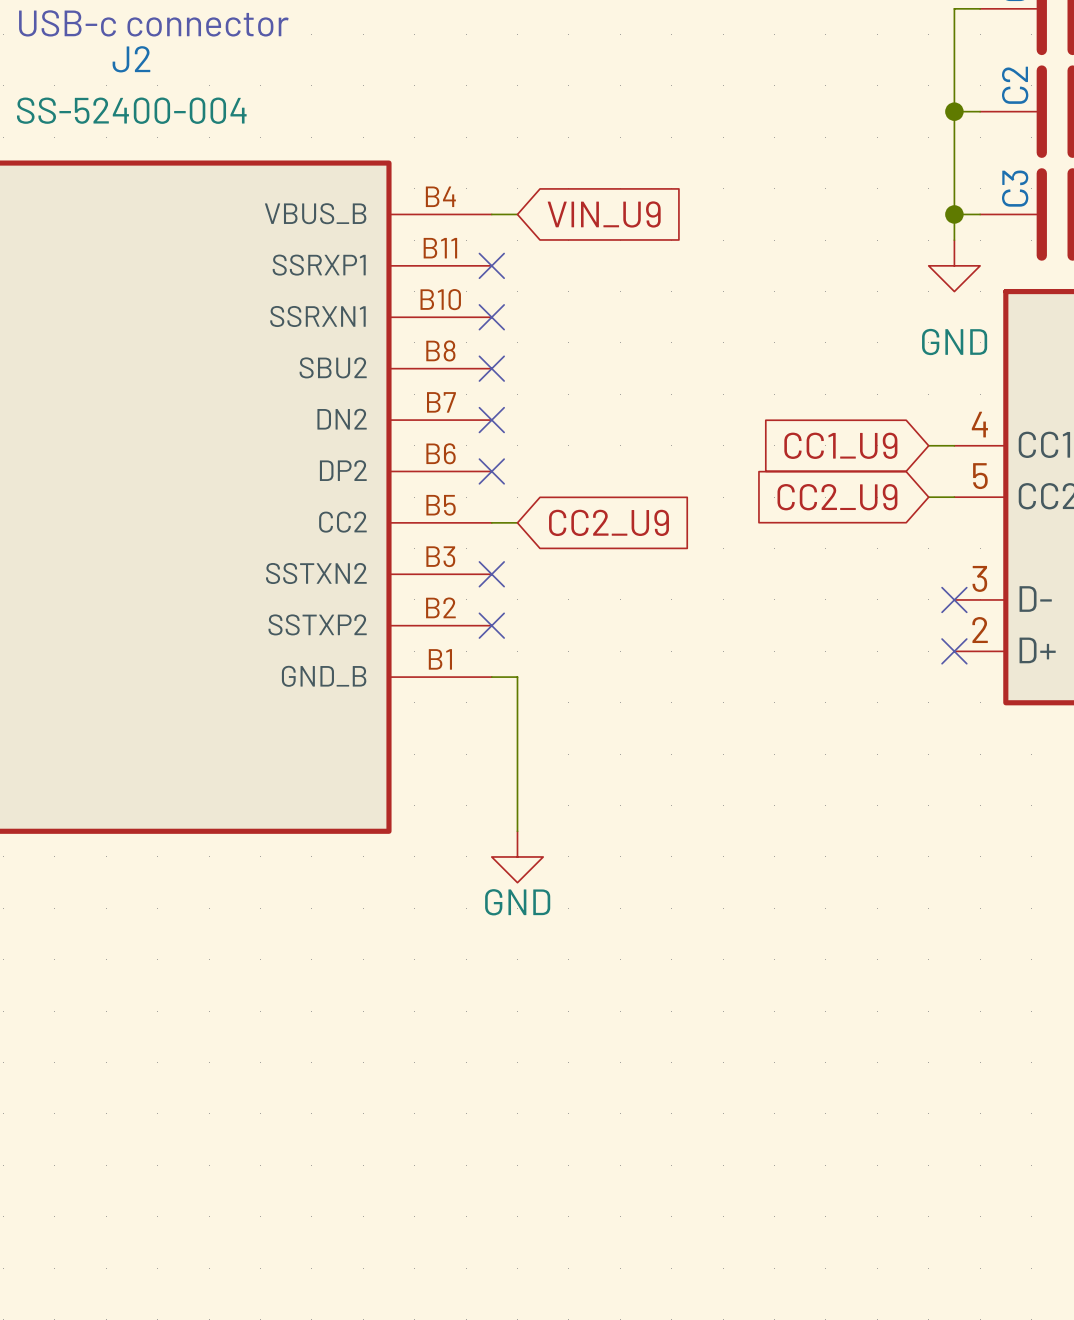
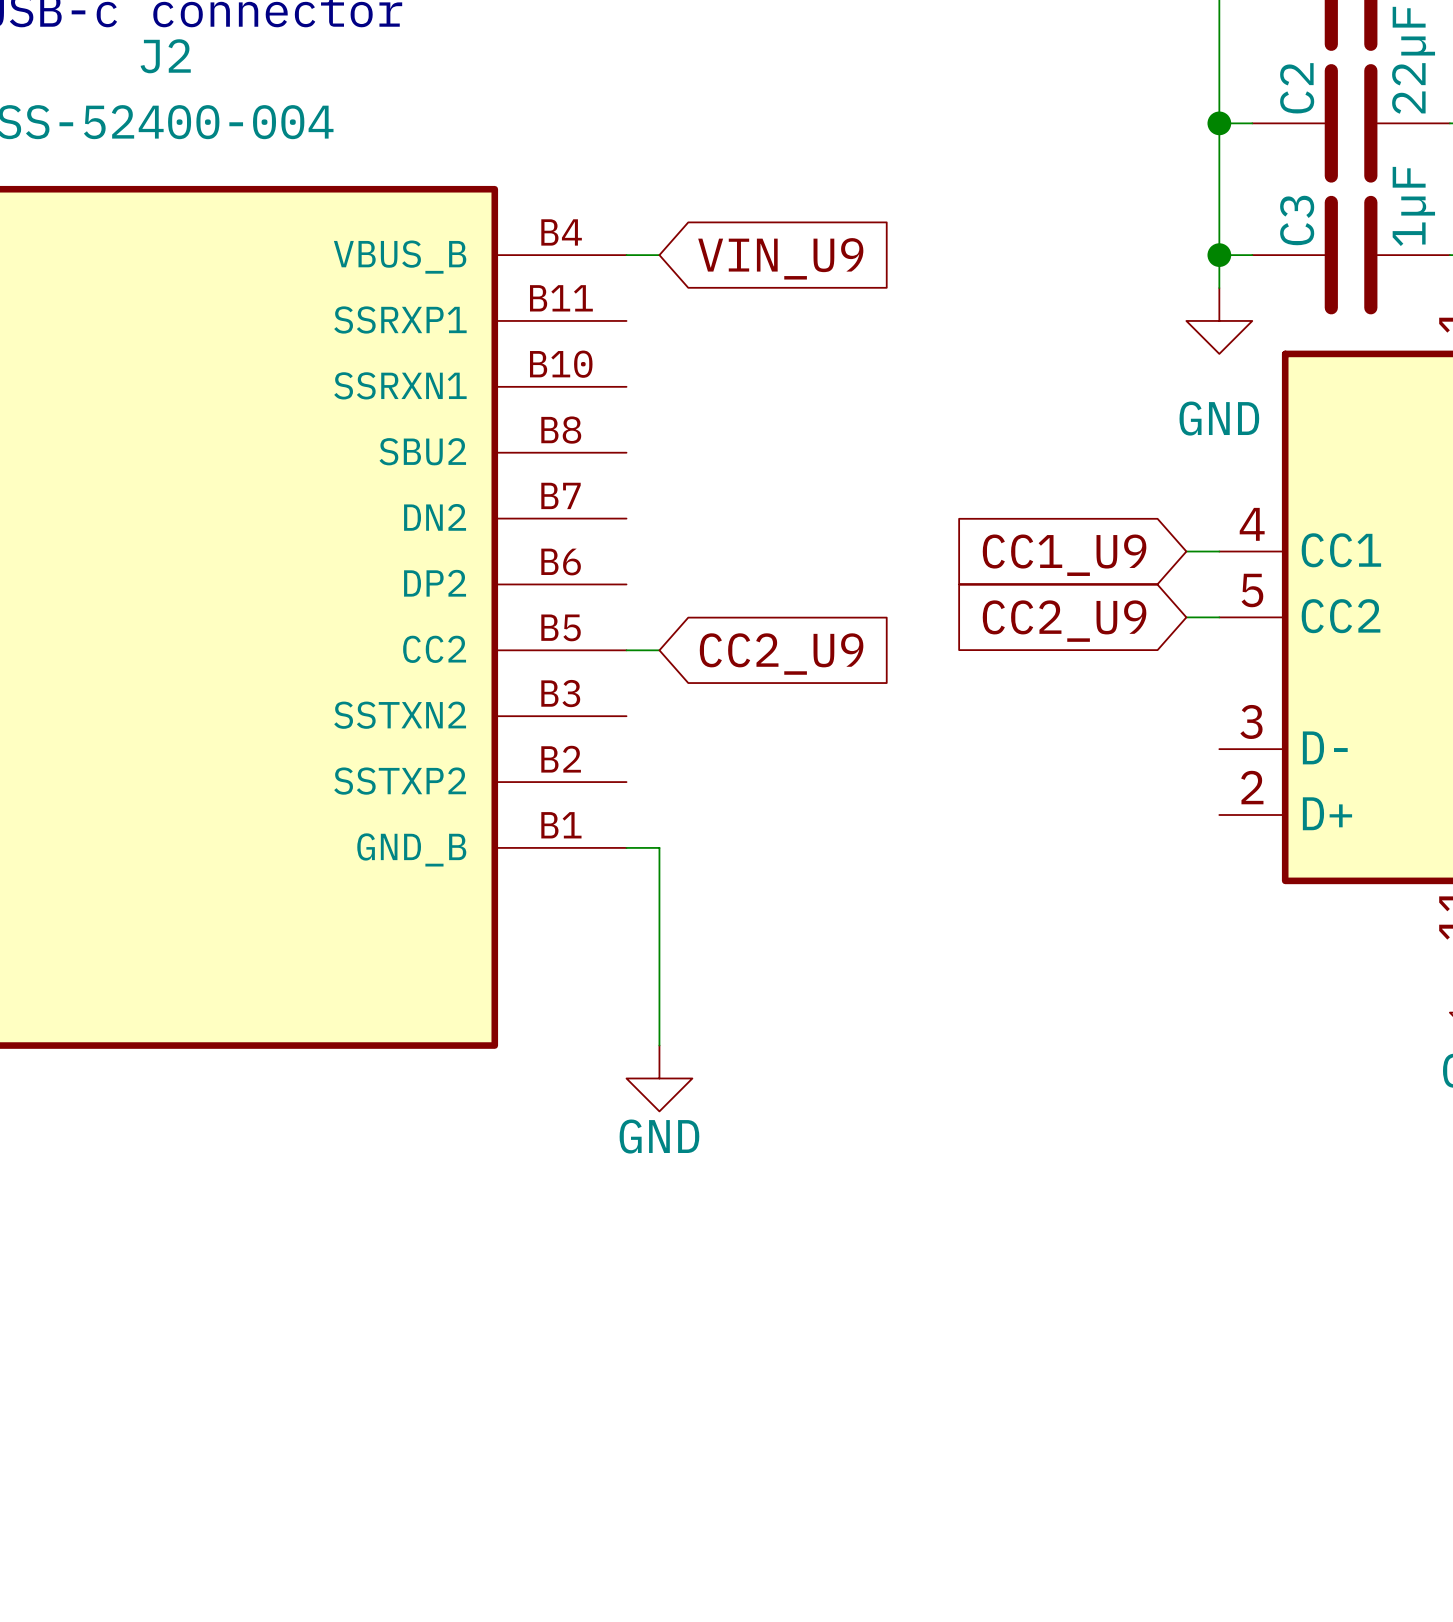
no-connect mark: (491, 265) -> none
no-connect mark: (491, 317) -> none
no-connect mark: (491, 368) -> none
no-connect mark: (491, 420) -> none
no-connect mark: (491, 471) -> none
no-connect mark: (491, 574) -> none
no-connect mark: (954, 599) -> none
no-connect mark: (491, 625) -> none
no-connect mark: (954, 651) -> none

